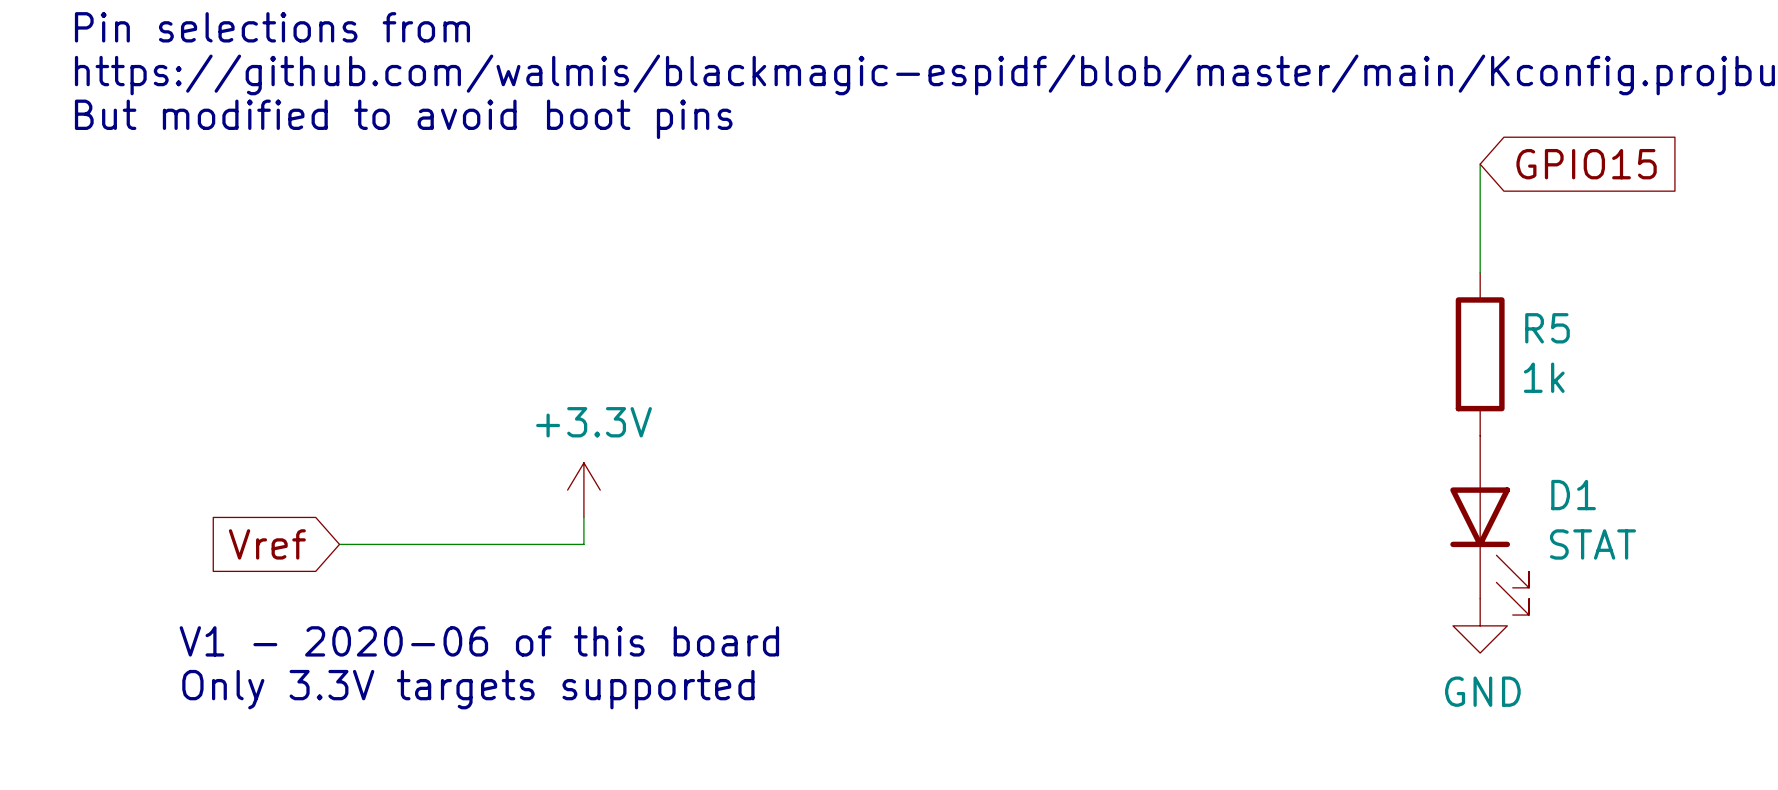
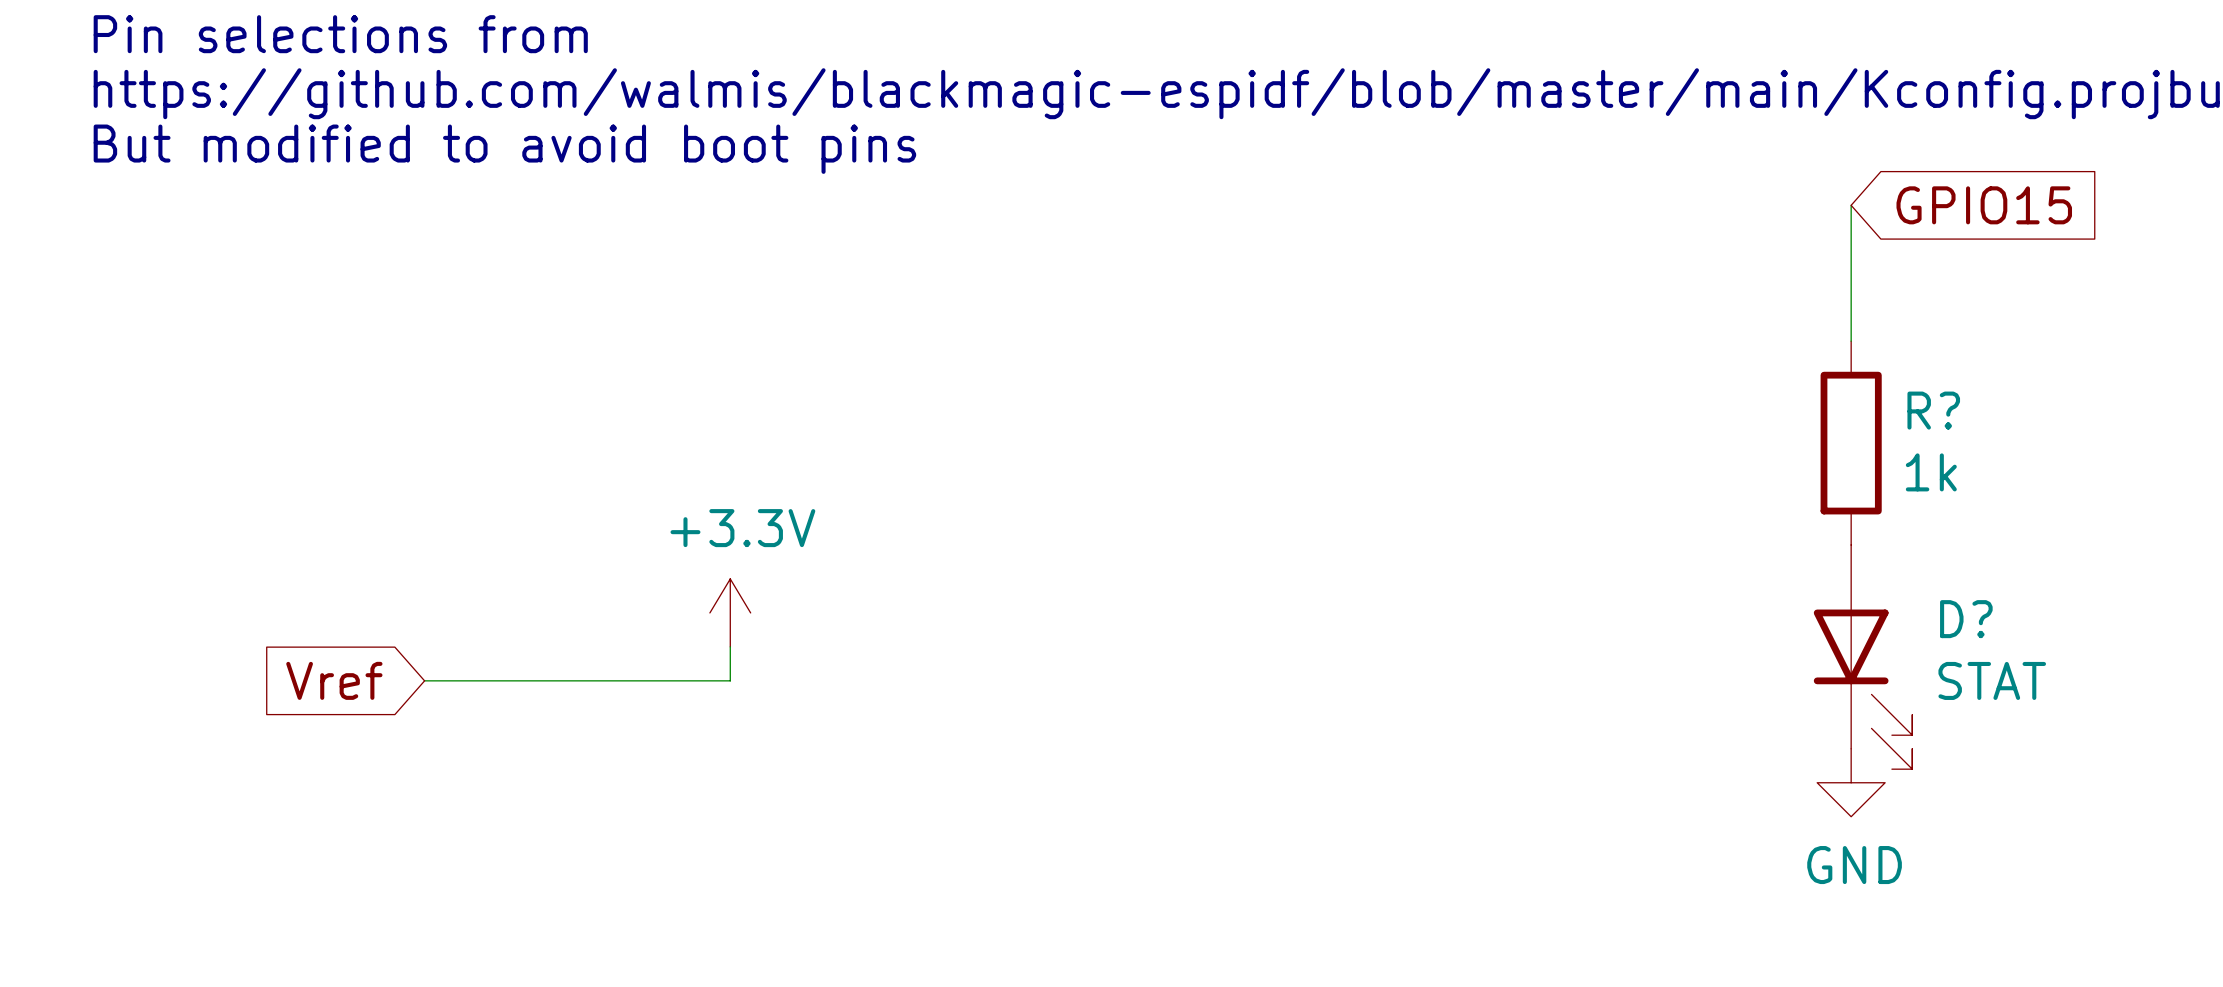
R5 name: R5 (1547, 328) -> R? (1933, 410)
D1 name: D1 (1573, 495) -> D? (1966, 619)
text: V1 - 2020-06 of this board (479, 641) -> none
text: Only 3.3V targets supported (468, 689) -> none

